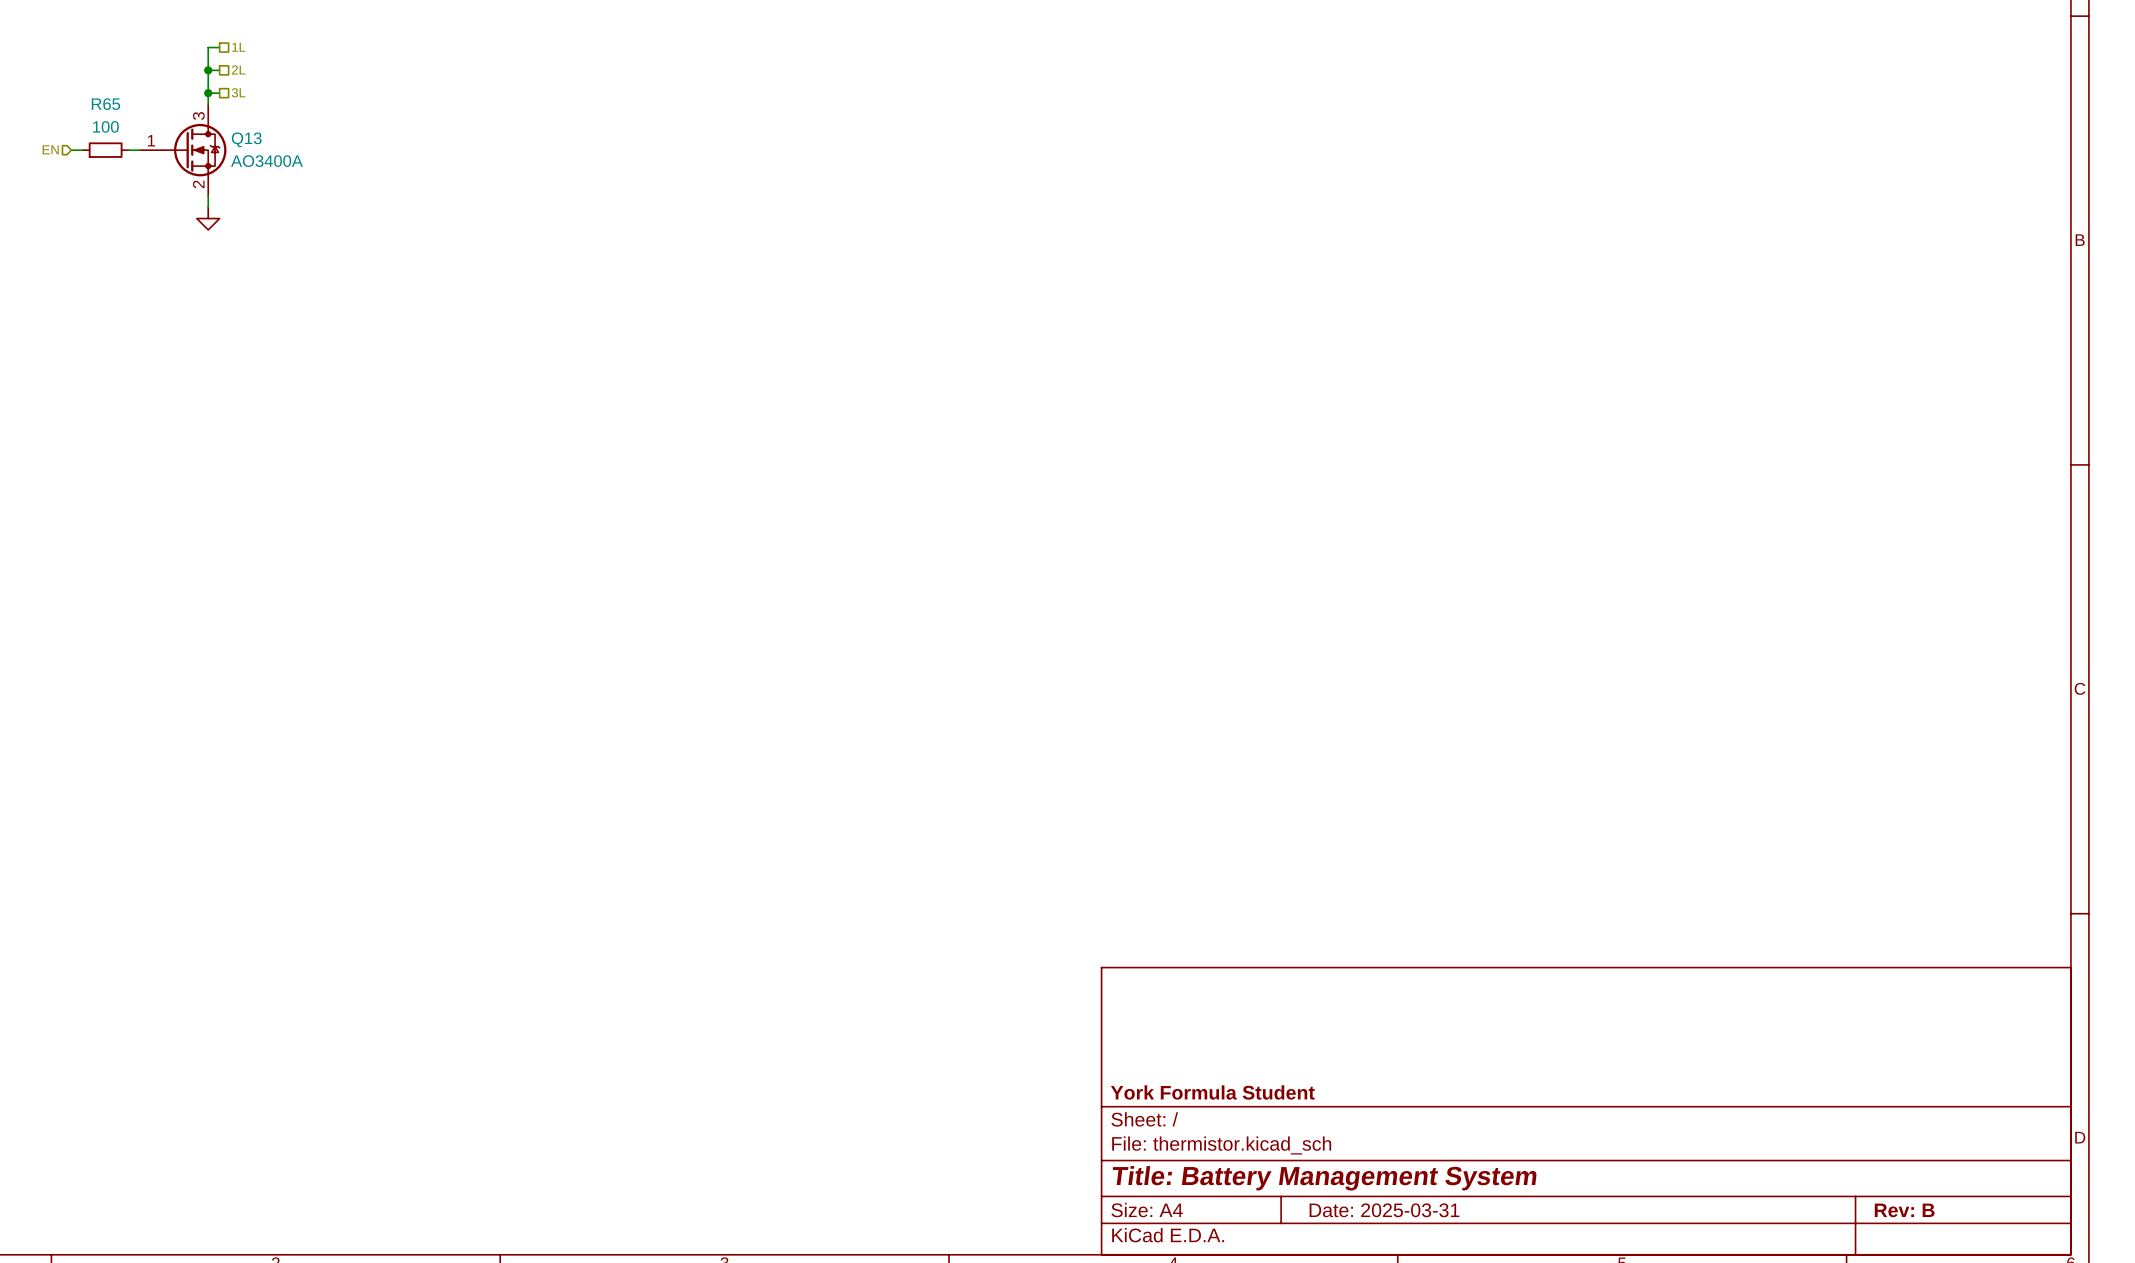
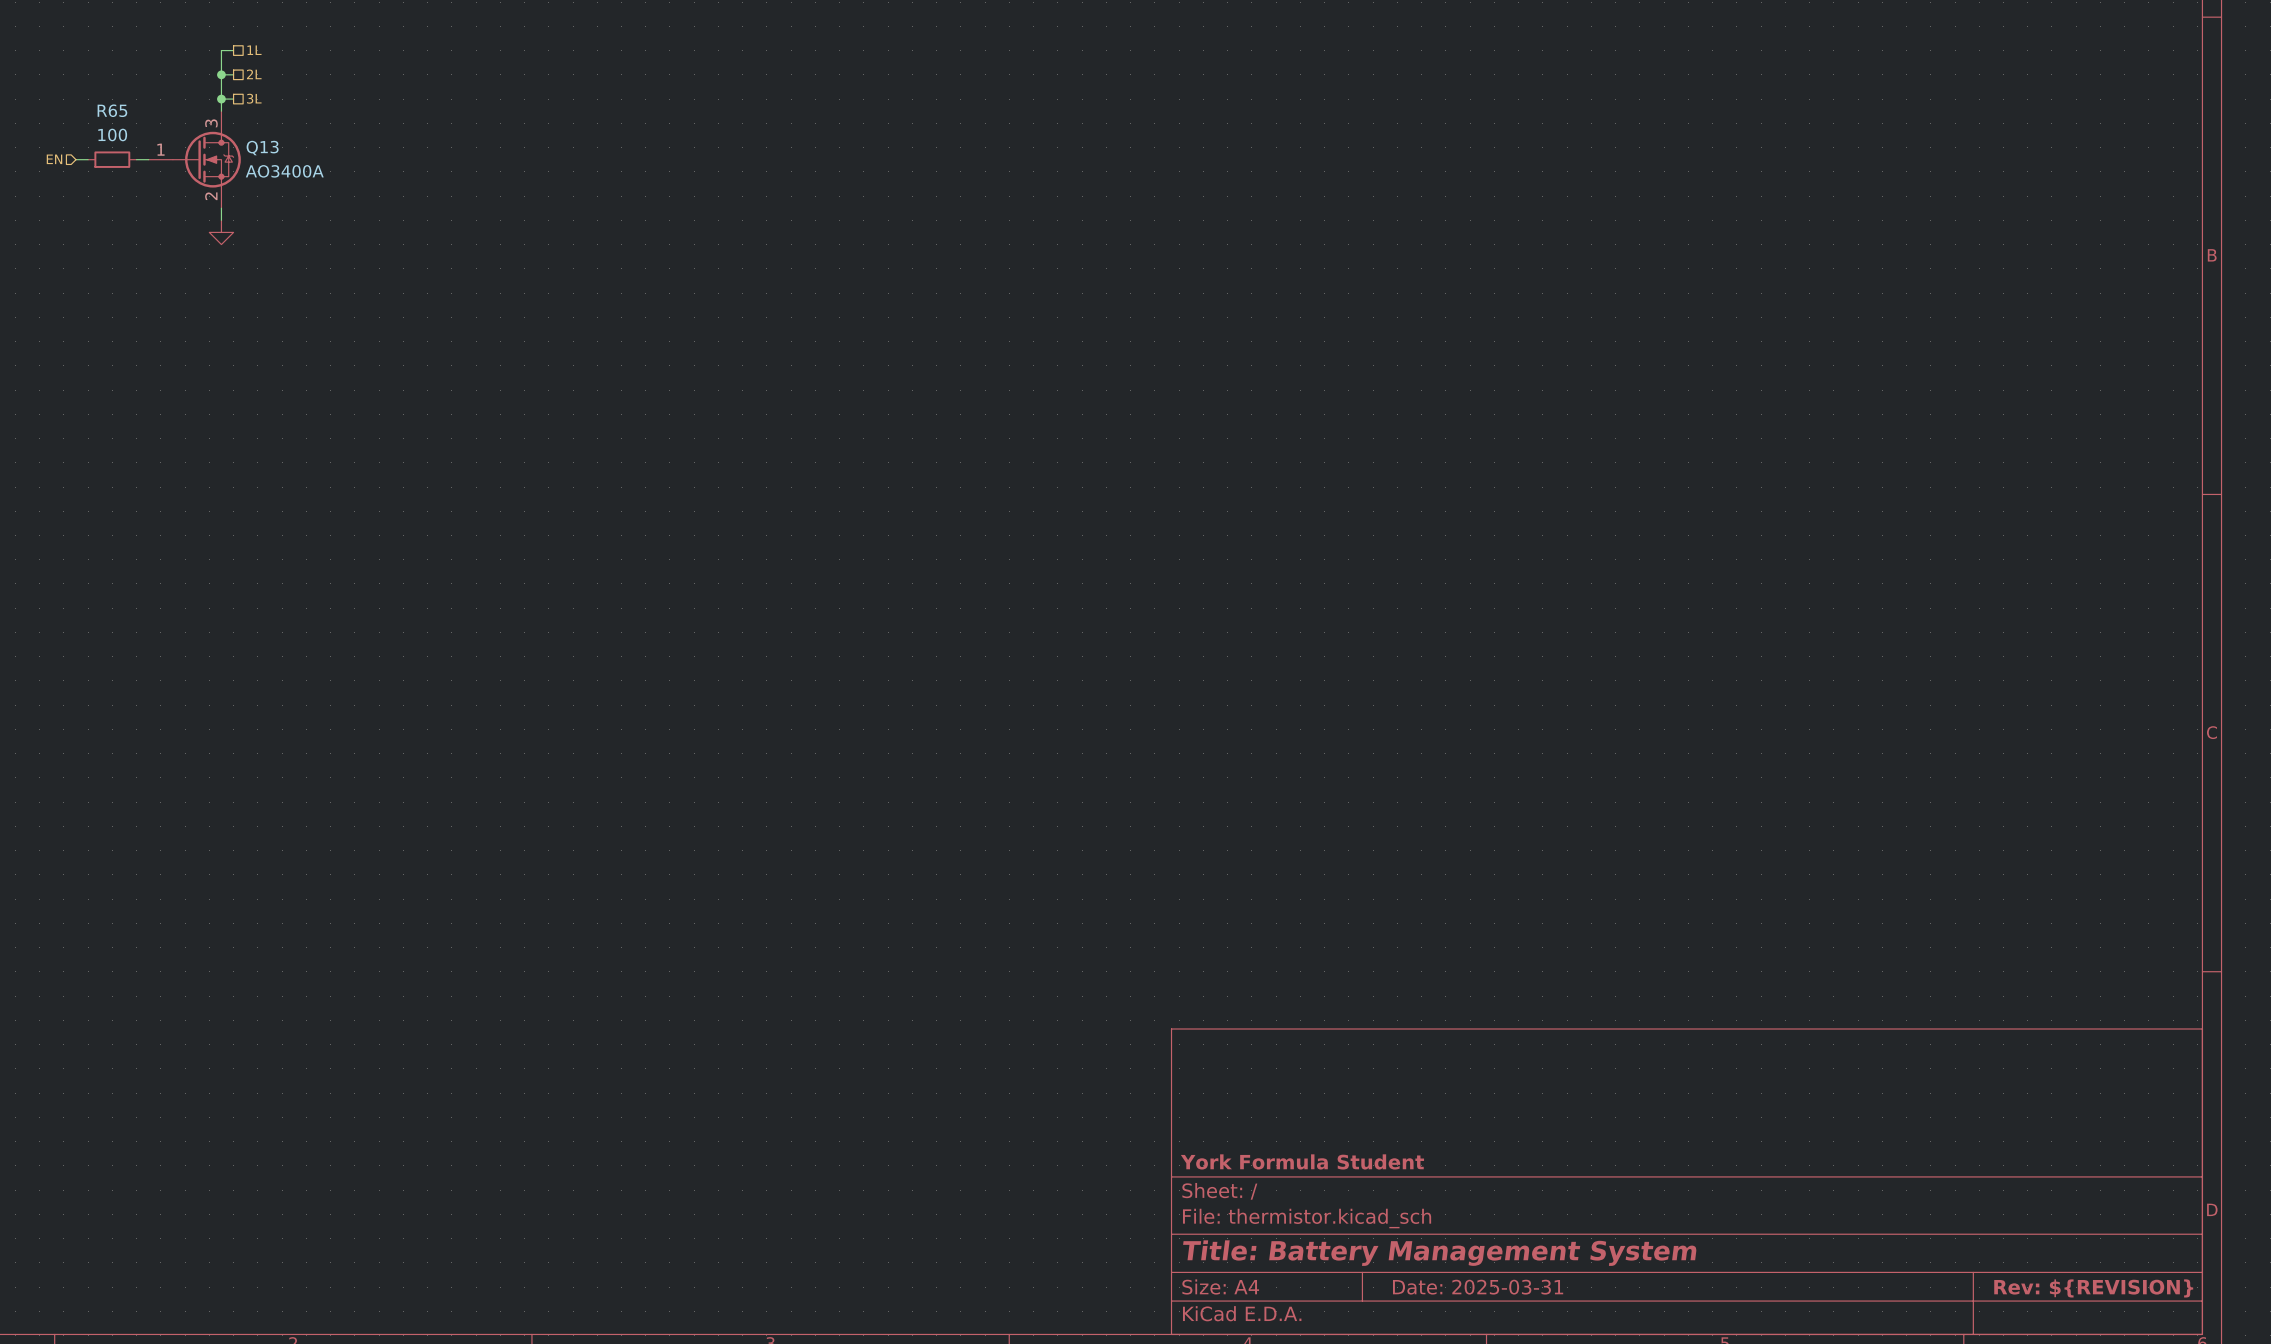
title block: Rev: B (1904, 1210) -> Rev: ${REVISION} (2093, 1288)

